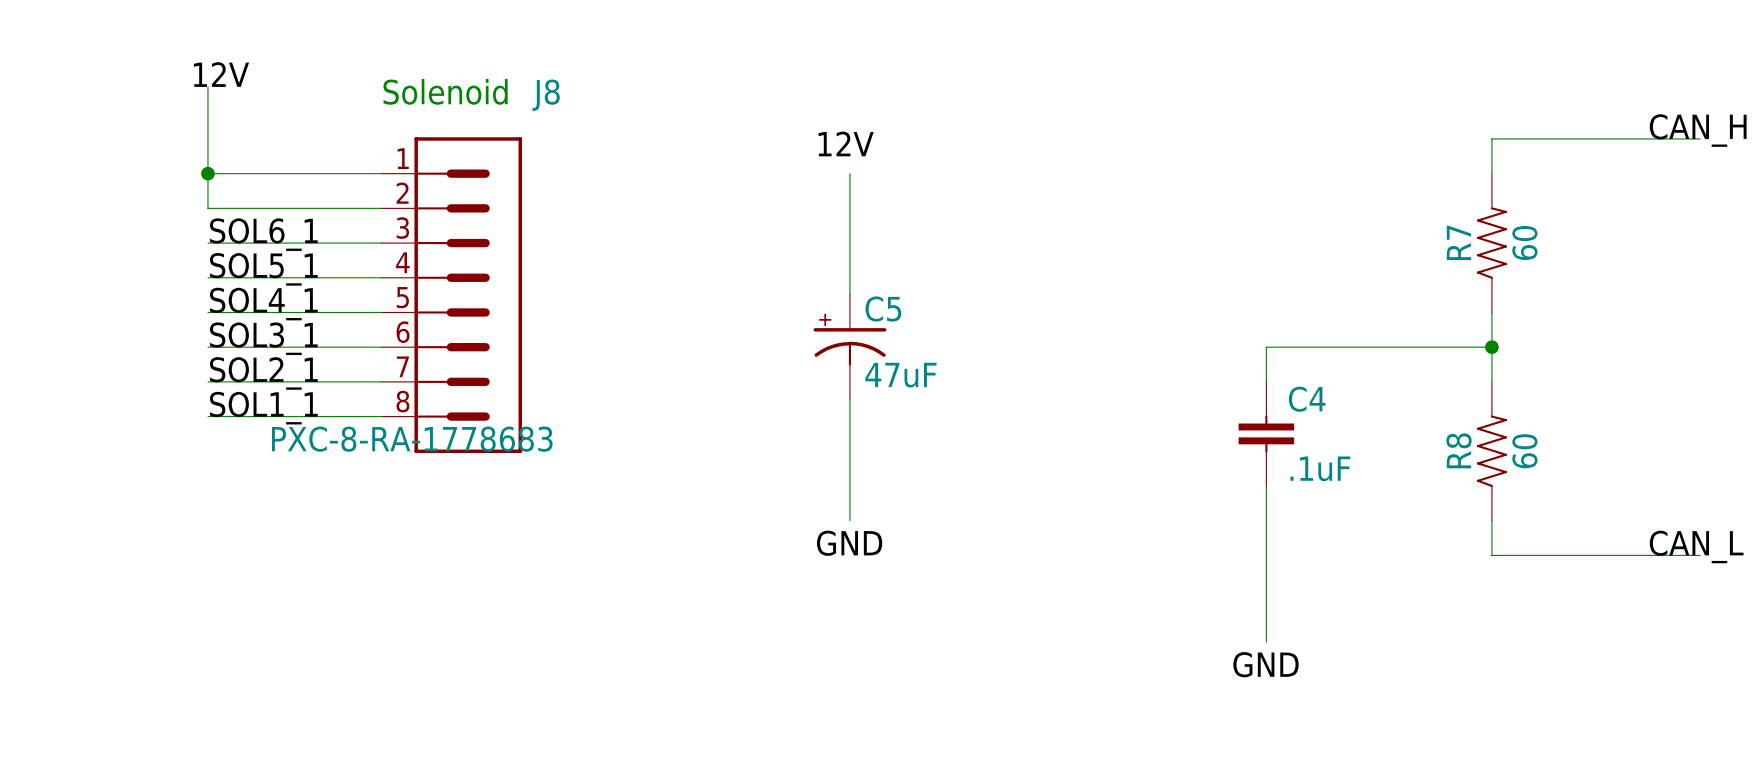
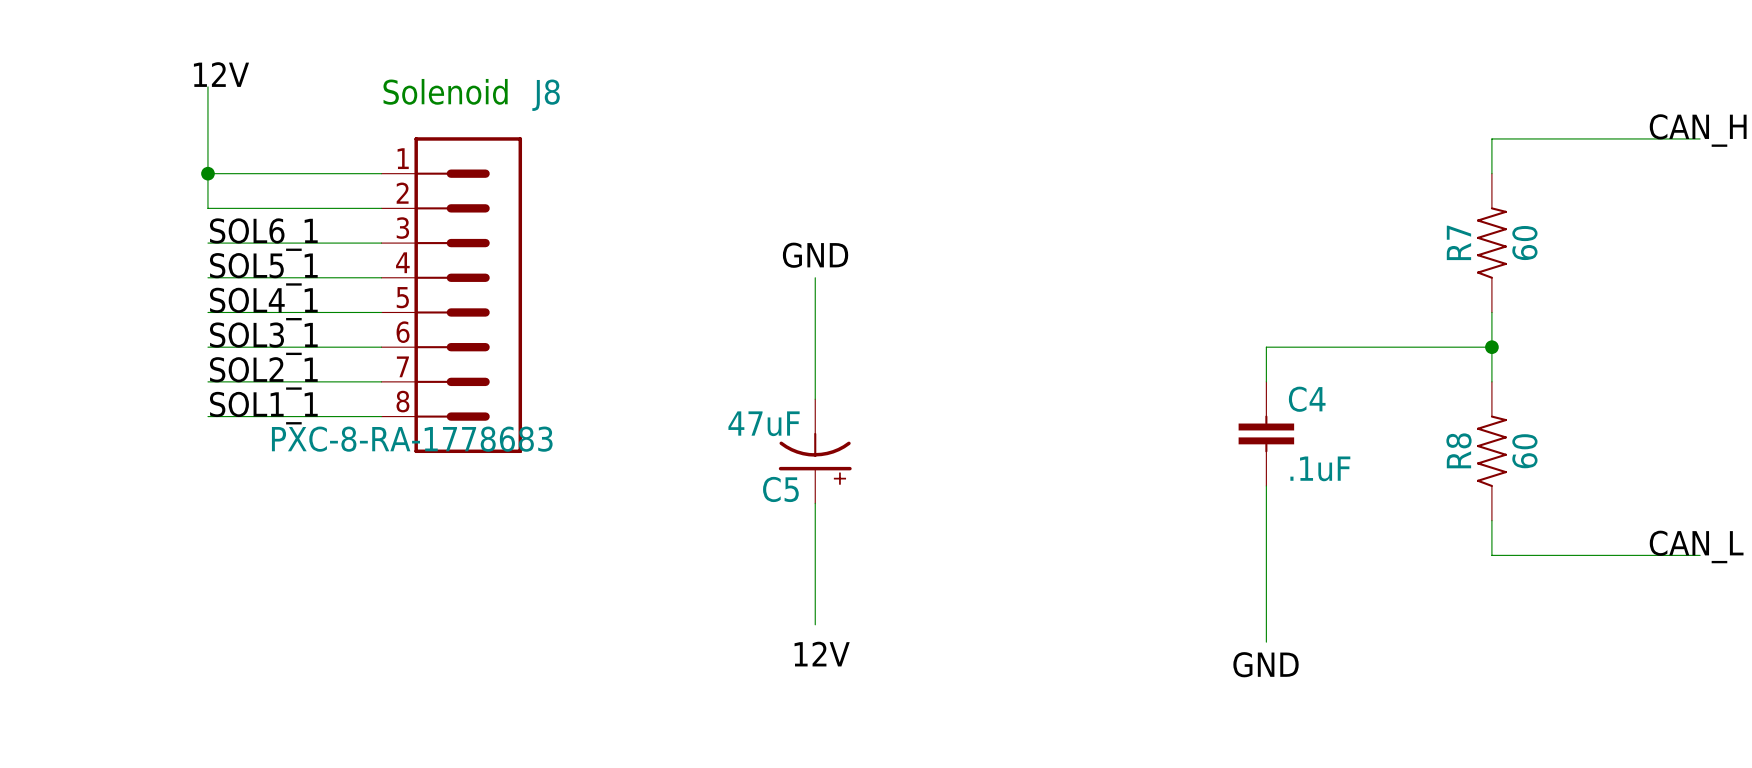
label: 12V (846, 143) -> none
wire: (849, 173) (849, 295) -> (815, 277) (815, 399)
C5 rotation: 0° (849, 339) -> 180° (815, 458)
C5 position: (849, 347) -> (815, 451)
wire: (849, 399) (849, 520) -> (815, 503) (815, 624)
label position: GND (849, 543) -> GND (815, 255)
label: none -> 12V (822, 654)

